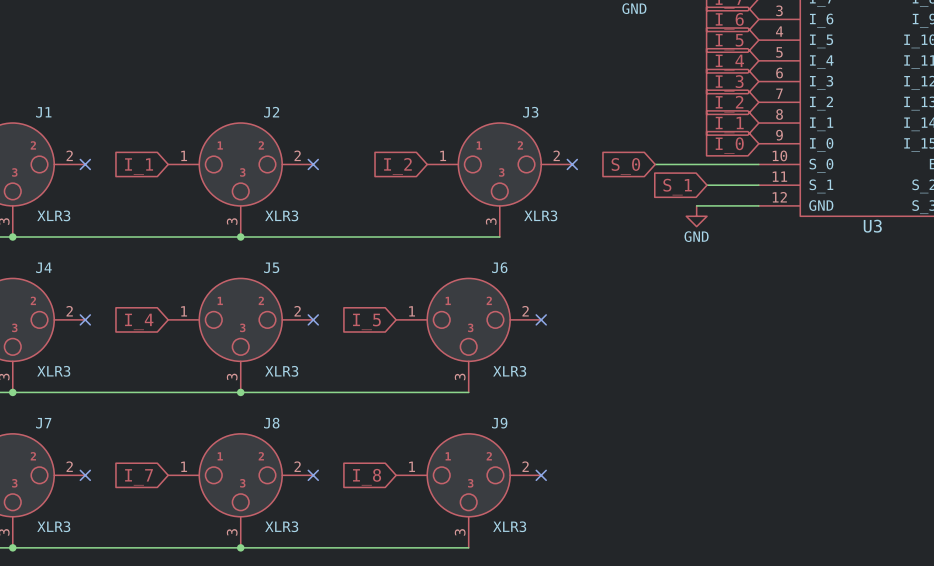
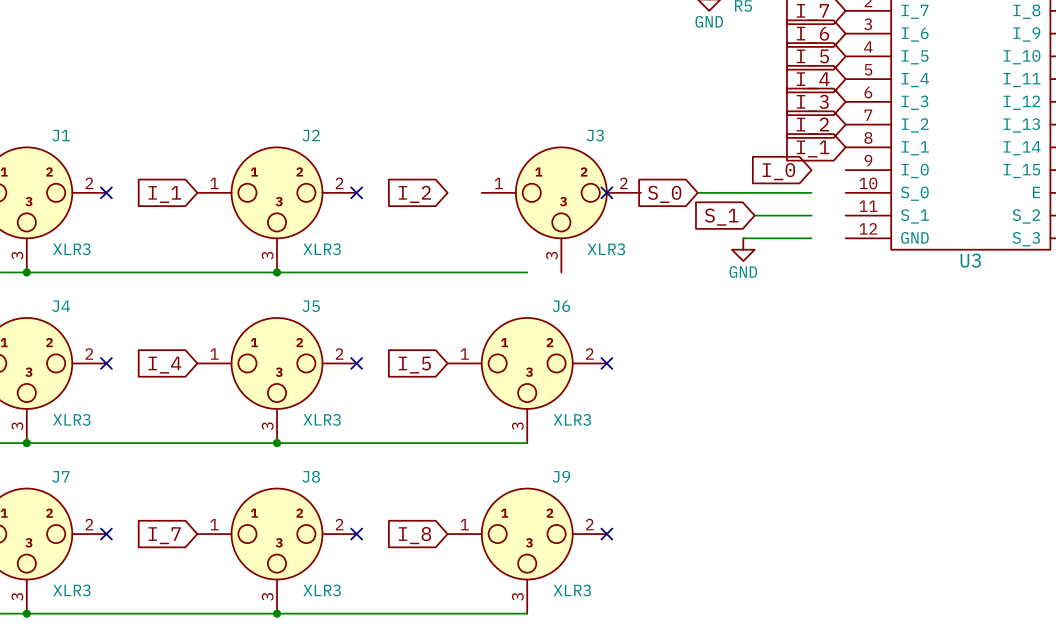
global label position: I_0 (729, 145) -> I_0 (778, 171)
no-connect mark position: (572, 164) -> (606, 192)
wire: (727, 164) (758, 164) -> (697, 192) (731, 192)
global label position: I_2 (397, 166) -> I_2 (414, 194)
global label position: S_0 (625, 166) -> S_0 (664, 194)
wire: (727, 185) (758, 185) -> (754, 215) (788, 215)
global label position: S_1 (677, 187) -> S_1 (721, 217)
wire: (727, 205) (758, 205) -> (743, 238) (777, 238)
power symbol position: GND (696, 216) -> GND (743, 249)
wire: (468, 237) (499, 237) -> none

